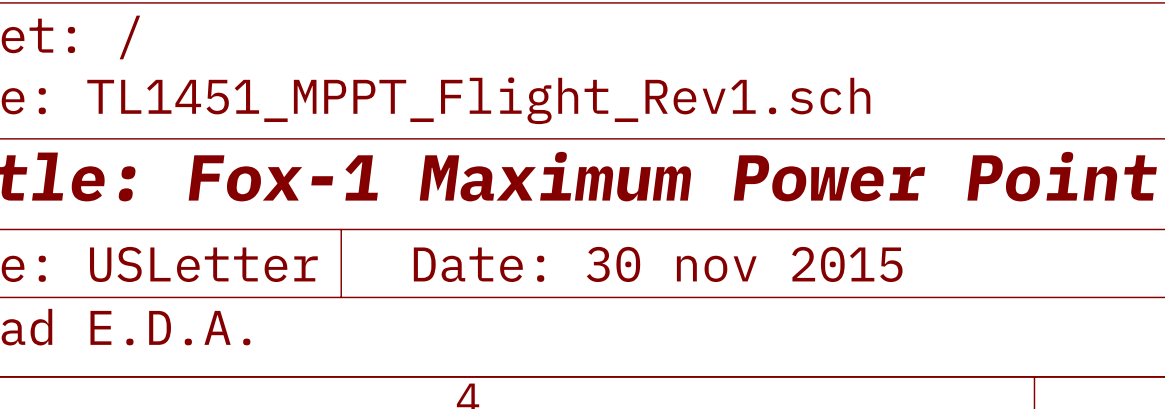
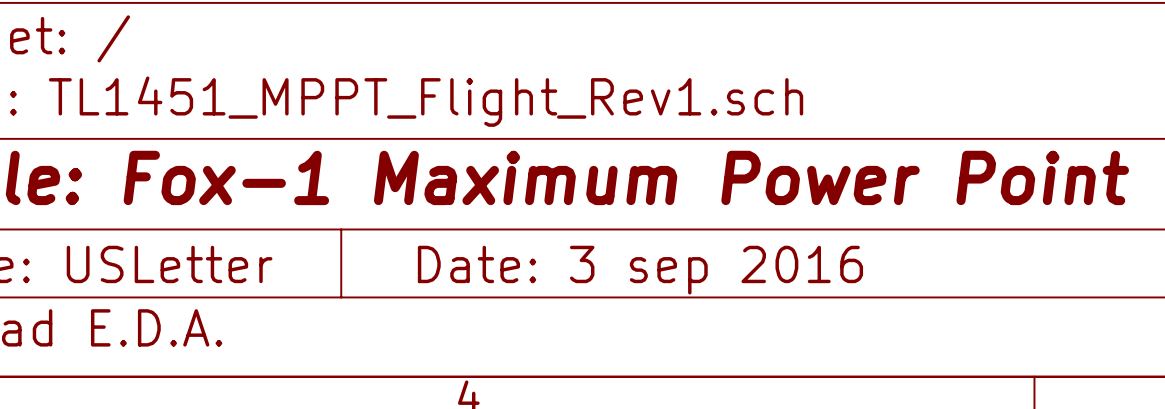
title block: Date: 30 nov 2015 (658, 264) -> Date: 3 sep 2016 (640, 270)

